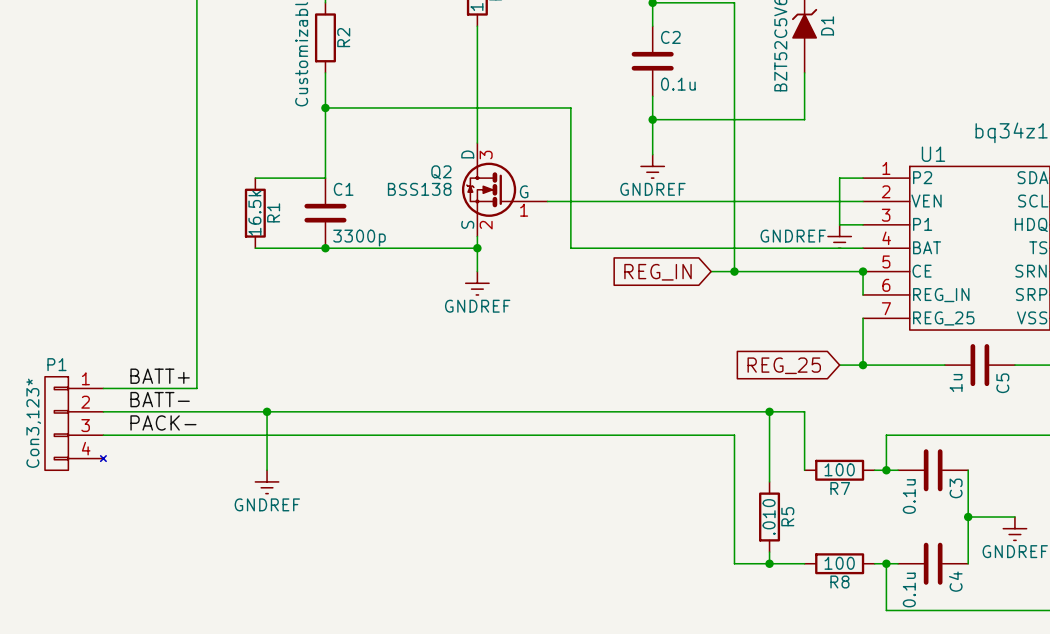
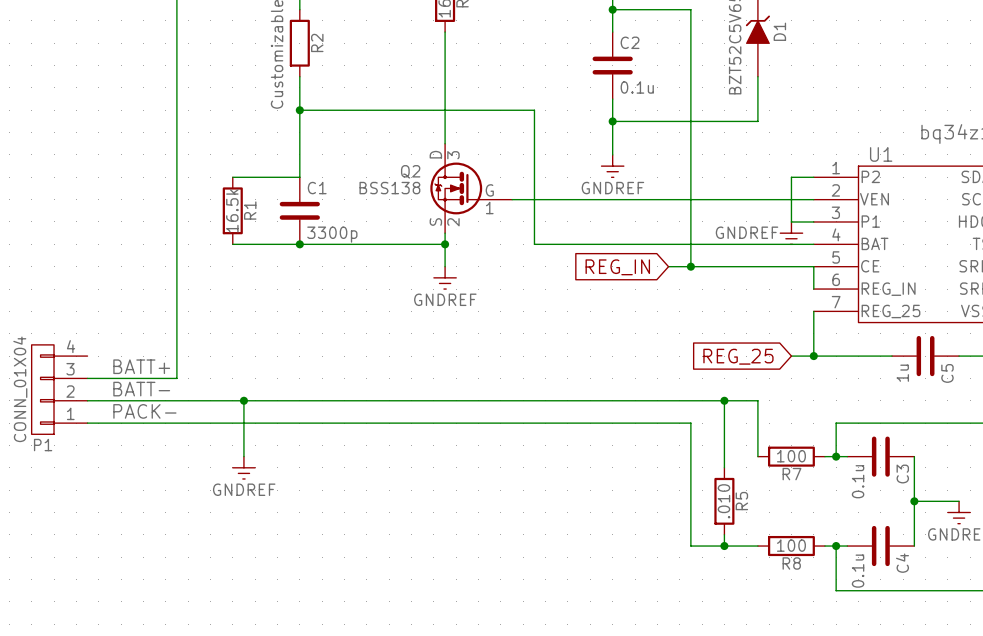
junction: (863, 271) -> none
P1 name position: P1 (56, 364) -> P1 (43, 445)
P1 symbol: [45, 376, 107, 471] -> [31, 344, 88, 435]
P1 value: Con3,123* (33, 423) -> CONN_01X04 (20, 389)

